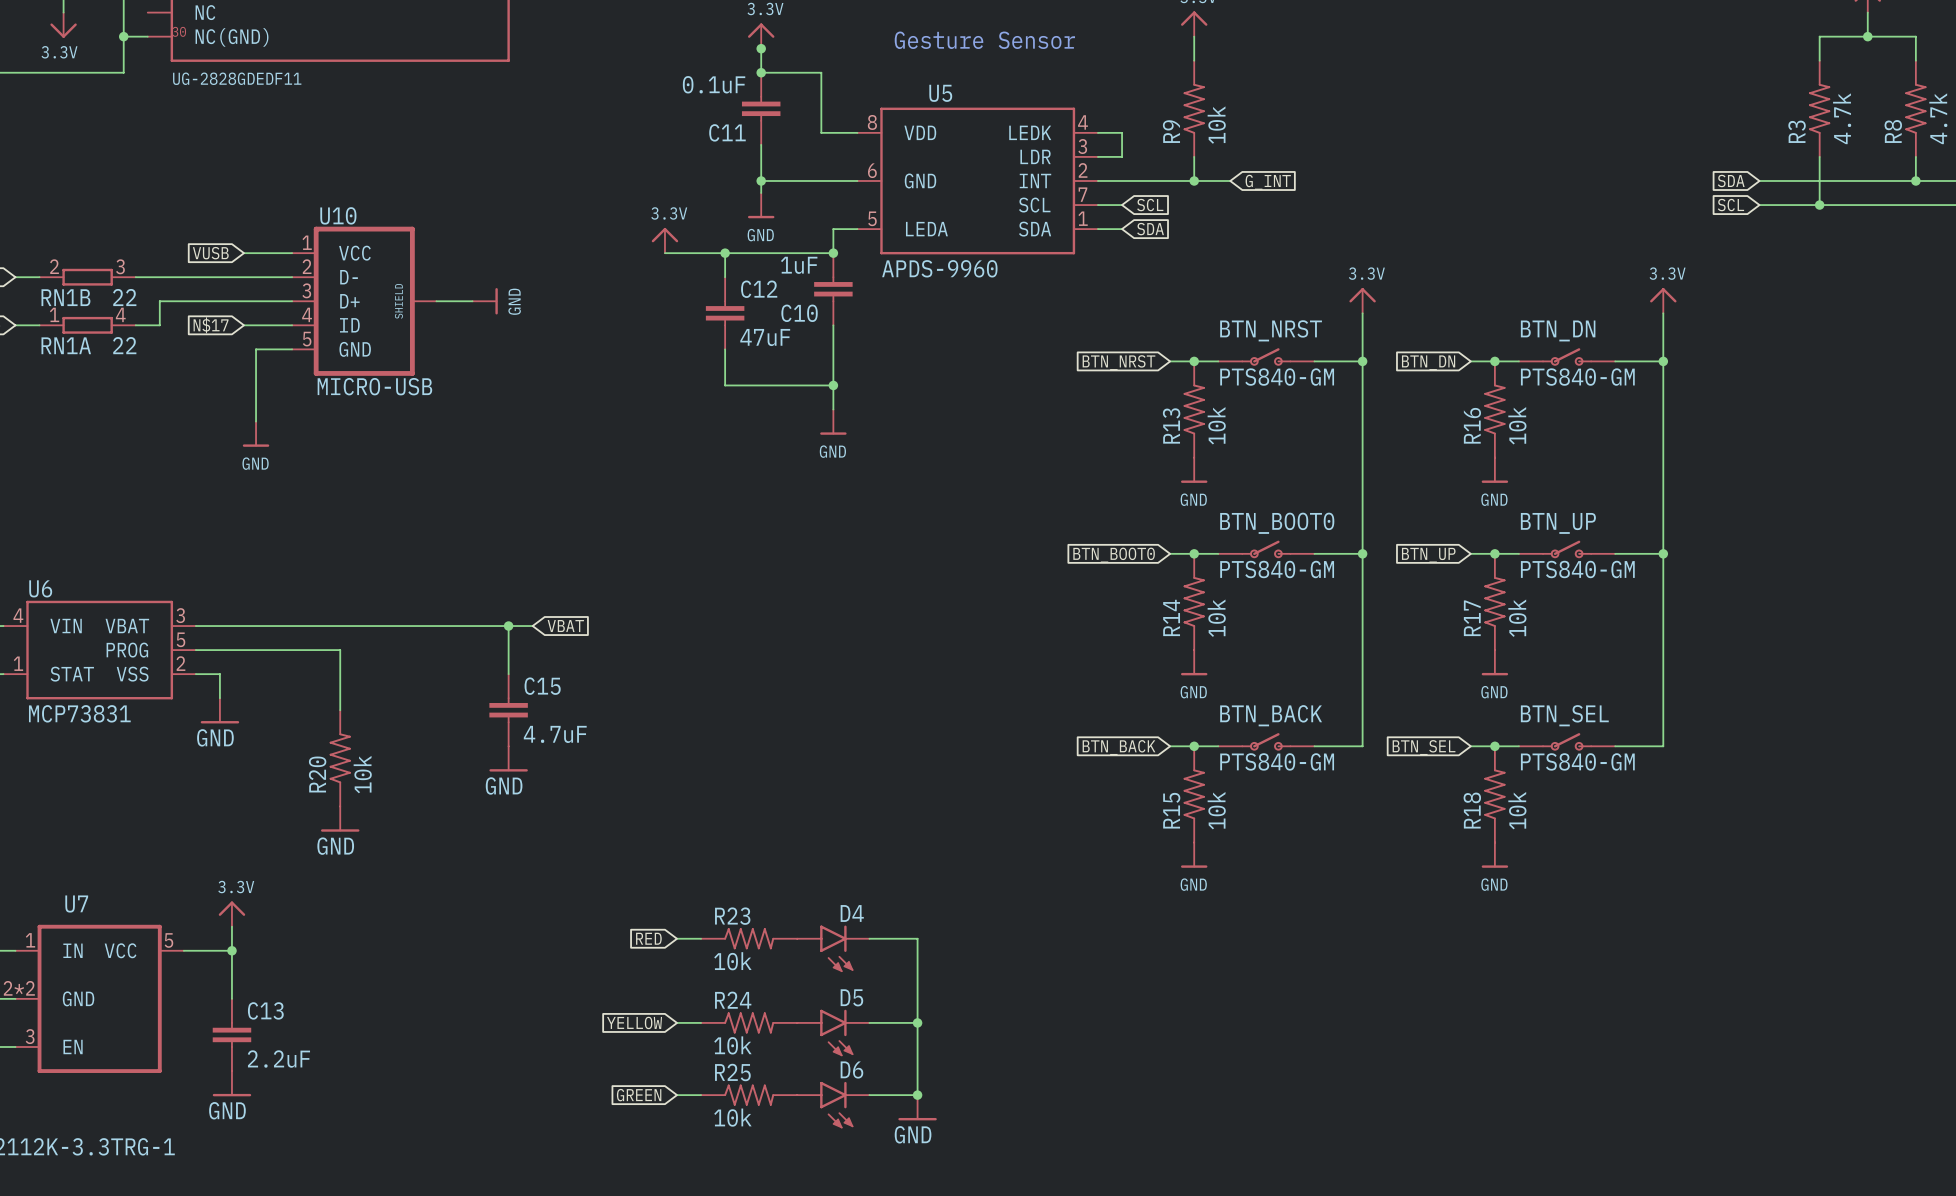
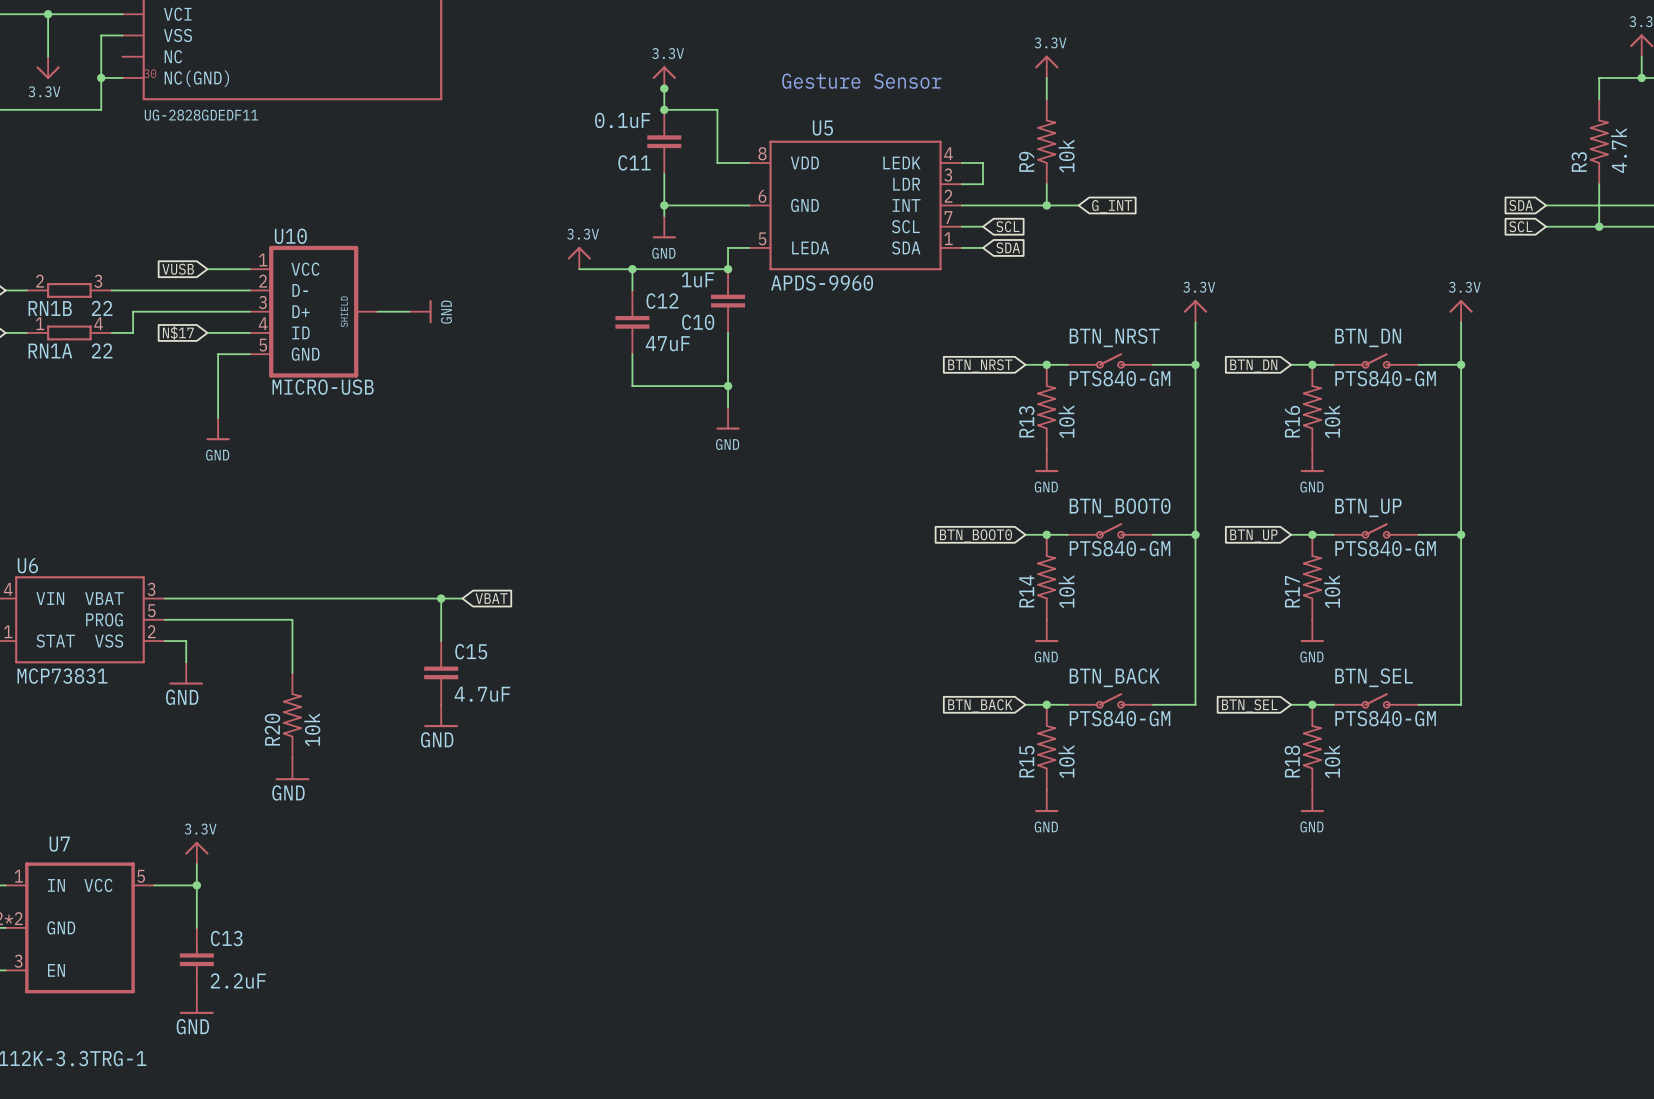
global label: RED (648, 938) -> none
wire: (677, 938) (701, 938) -> none
R23: 10k (749, 938) -> none
wire: (869, 938) (917, 938) (917, 1095) (869, 1095) -> none
D4: (833, 948) -> none
global label: YELLOW (634, 1022) -> none
wire: (677, 1022) (701, 1022) -> none
R24: 10k (749, 1022) -> none
wire: (869, 1022) (917, 1022) -> none
junction: (917, 1022) -> none
D5: (833, 1032) -> none
global label: GREEN (639, 1095) -> none
wire: (677, 1095) (701, 1095) -> none
R25: 10k (749, 1095) -> none
junction: (917, 1095) -> none
D6: (833, 1105) -> none
power symbol: GND (917, 1107) -> none

